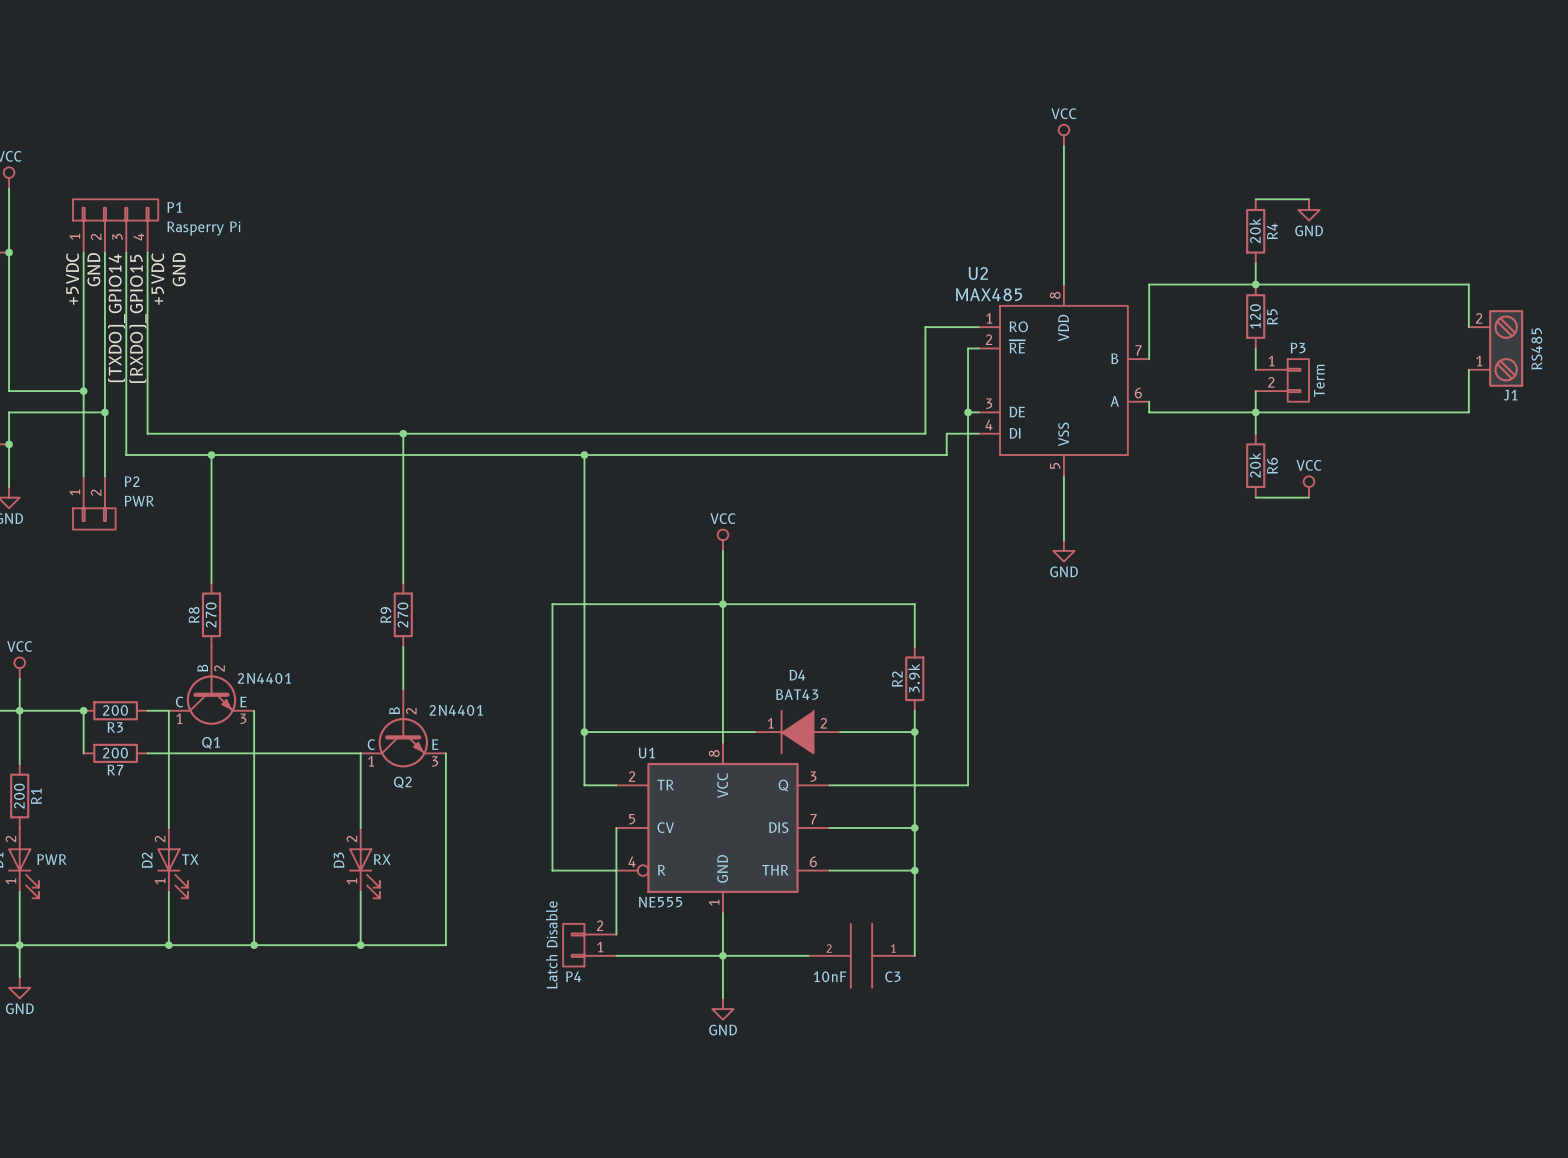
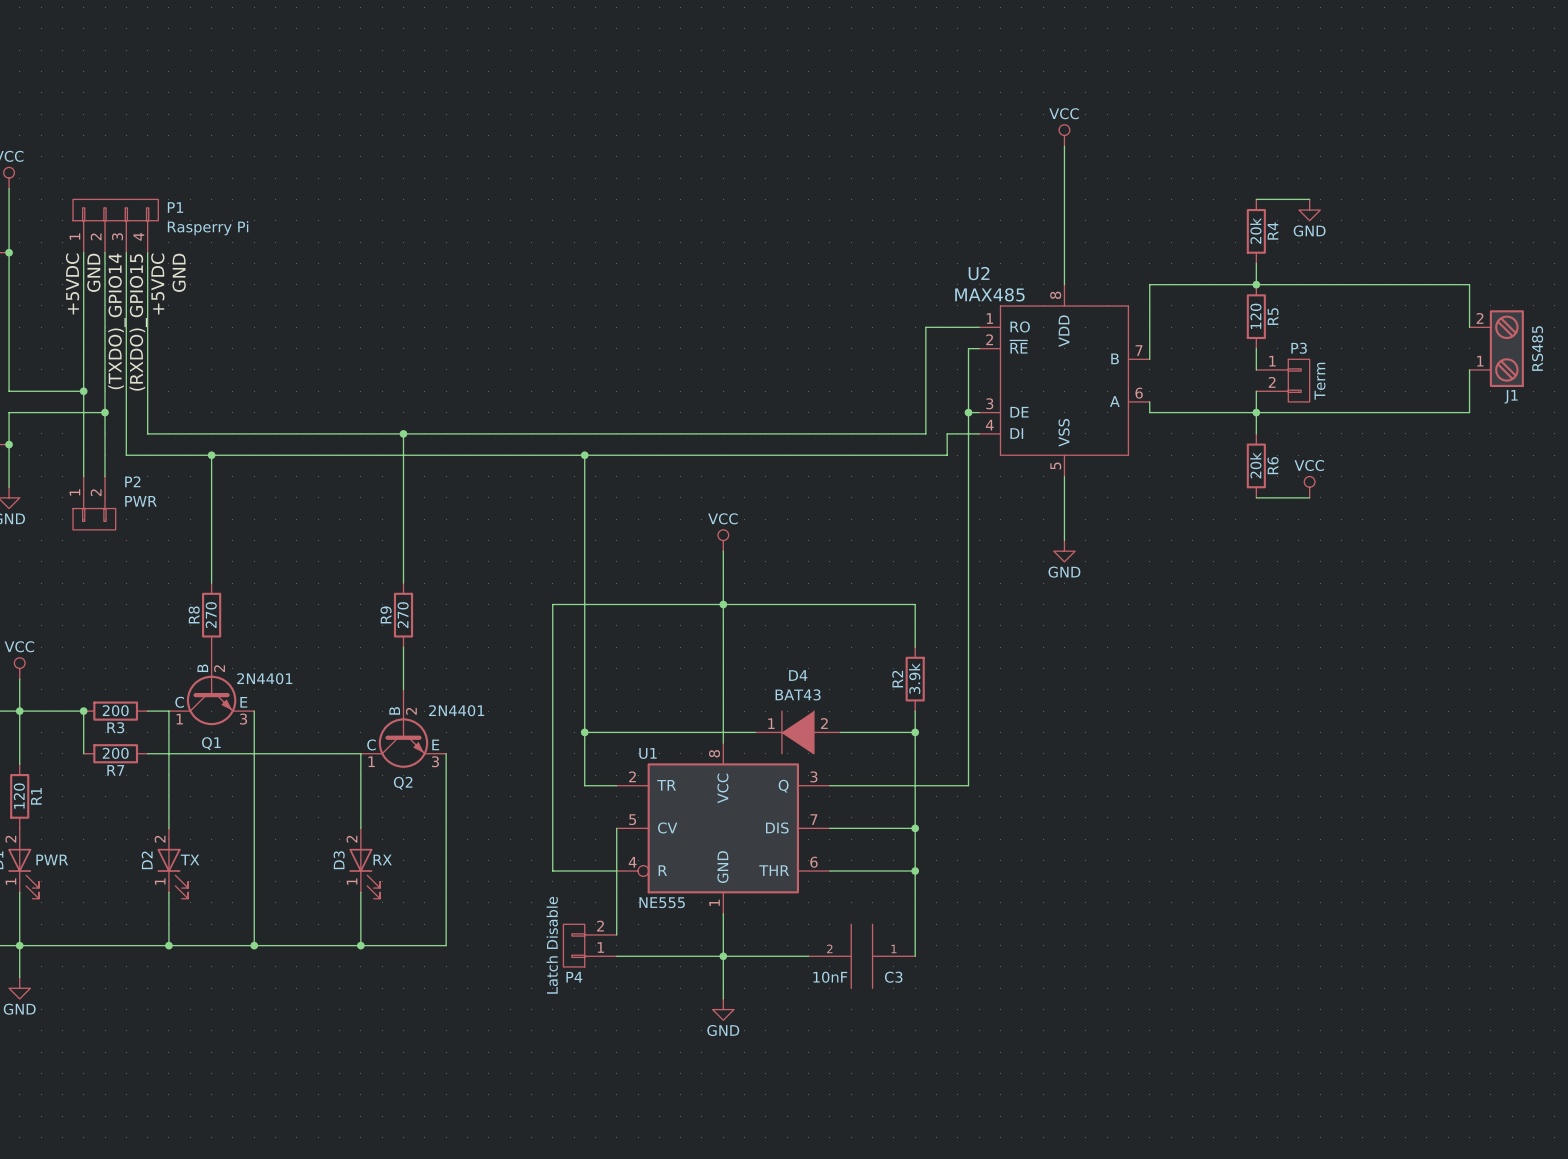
R1 value: 200 (19, 796) -> 120 (19, 796)

